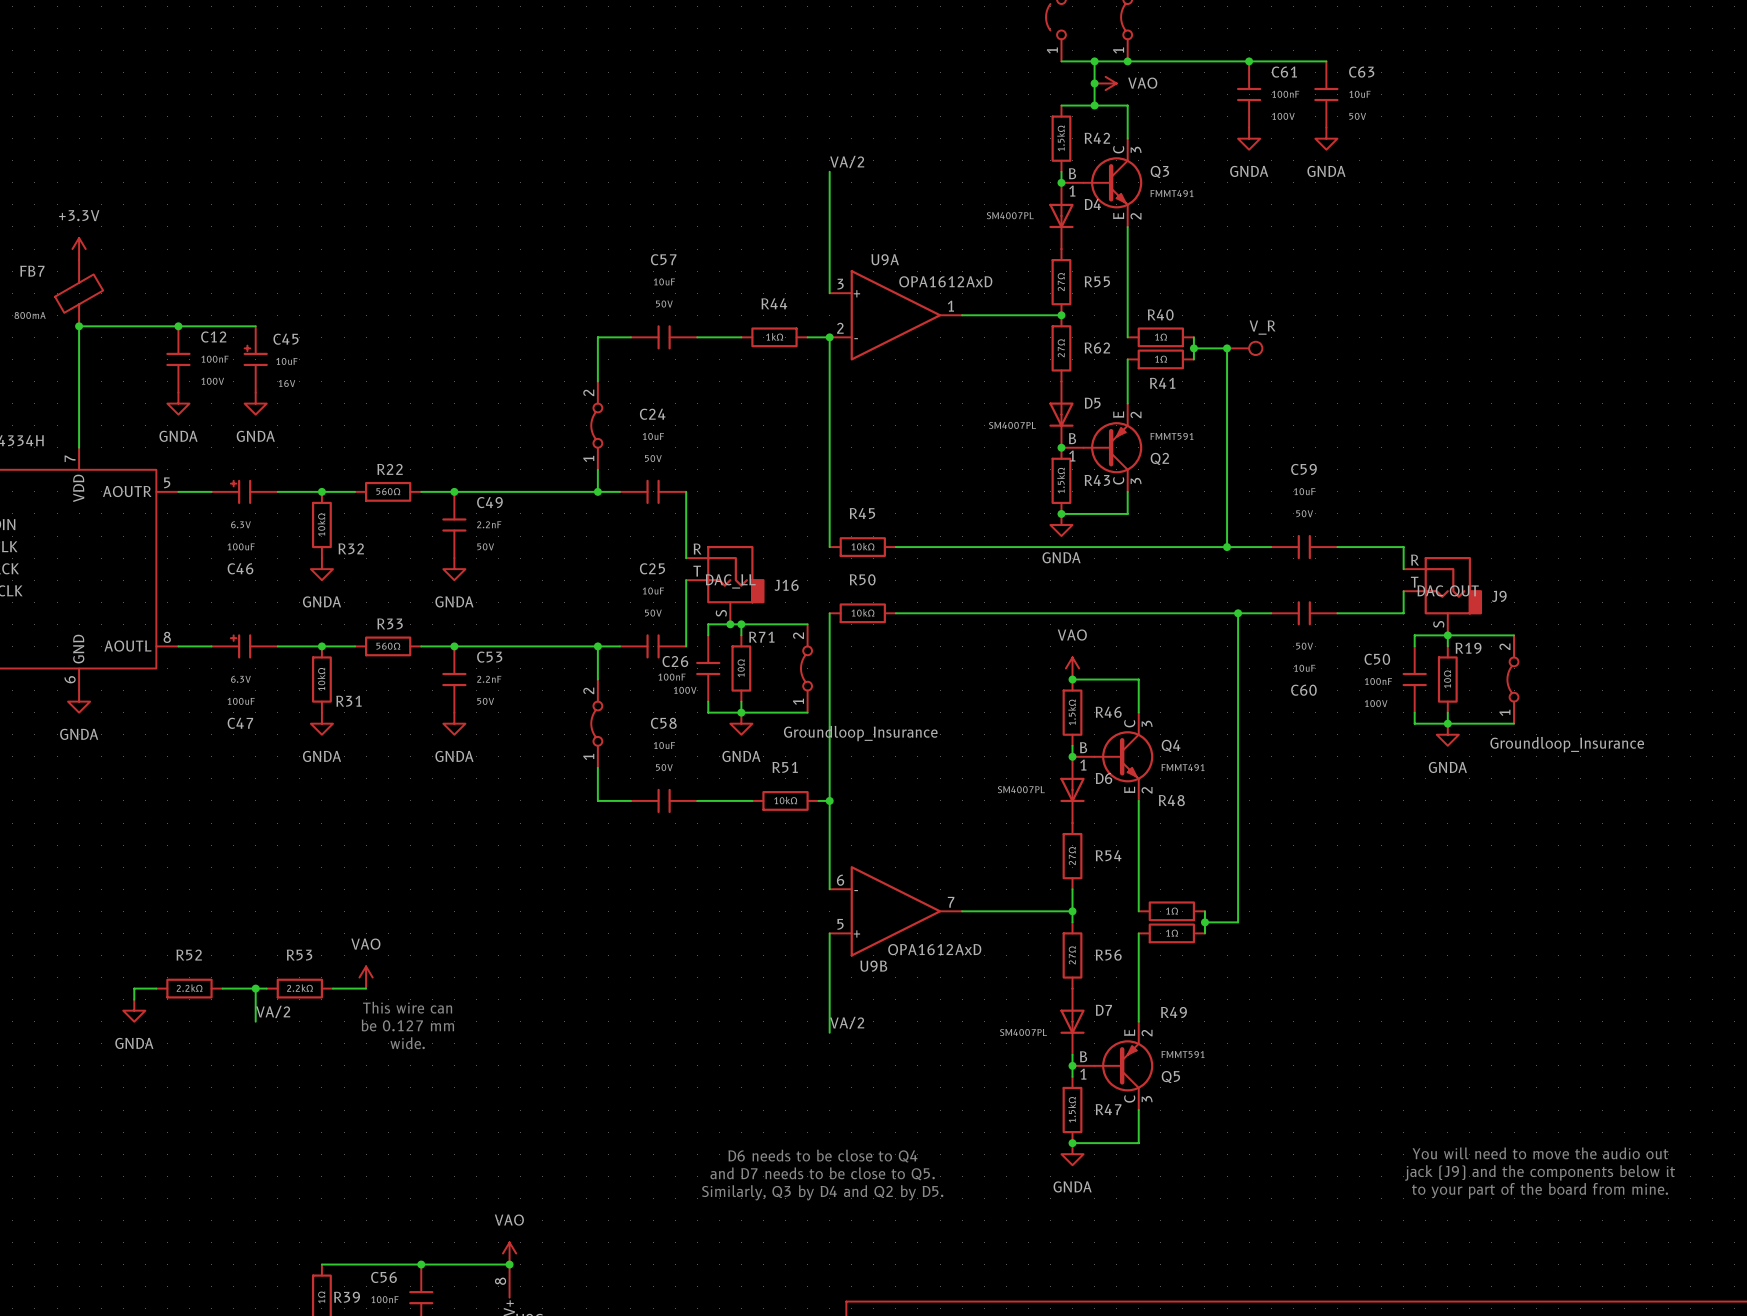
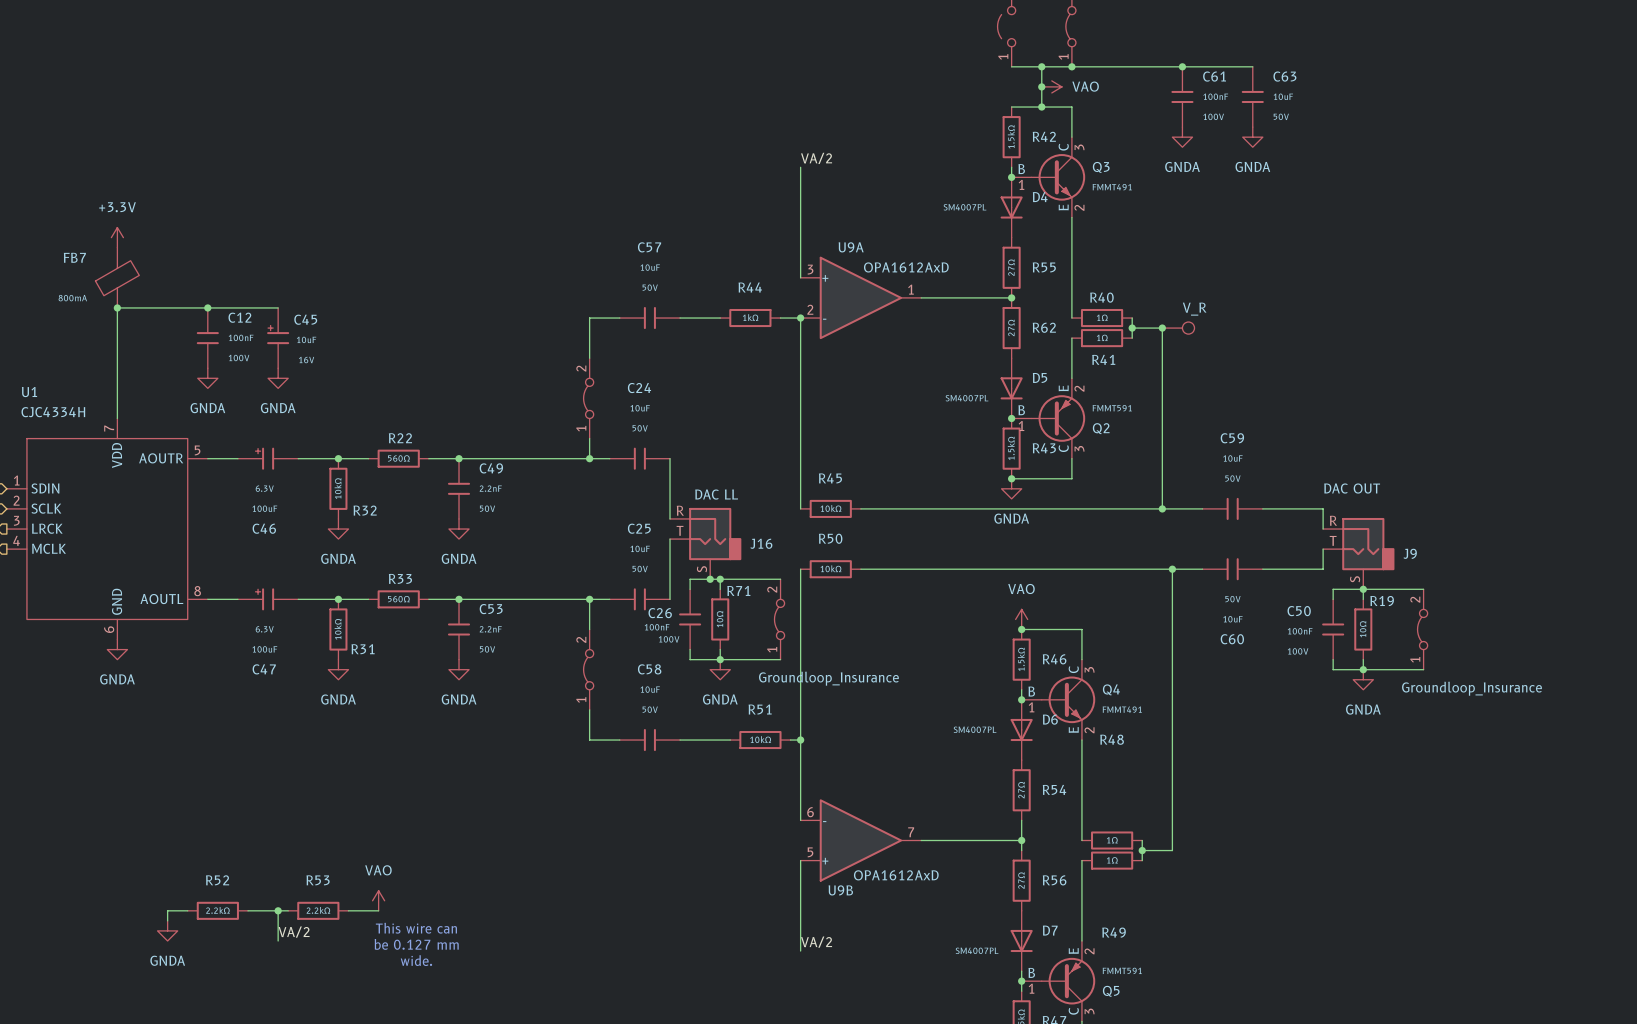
J9 value: none -> DAC OUT (1352, 488)
J16 value: none -> DAC LL (716, 494)
J16 text: DAC_LL (730, 581) -> none
J9 text: DAC OUT (1448, 590) -> none

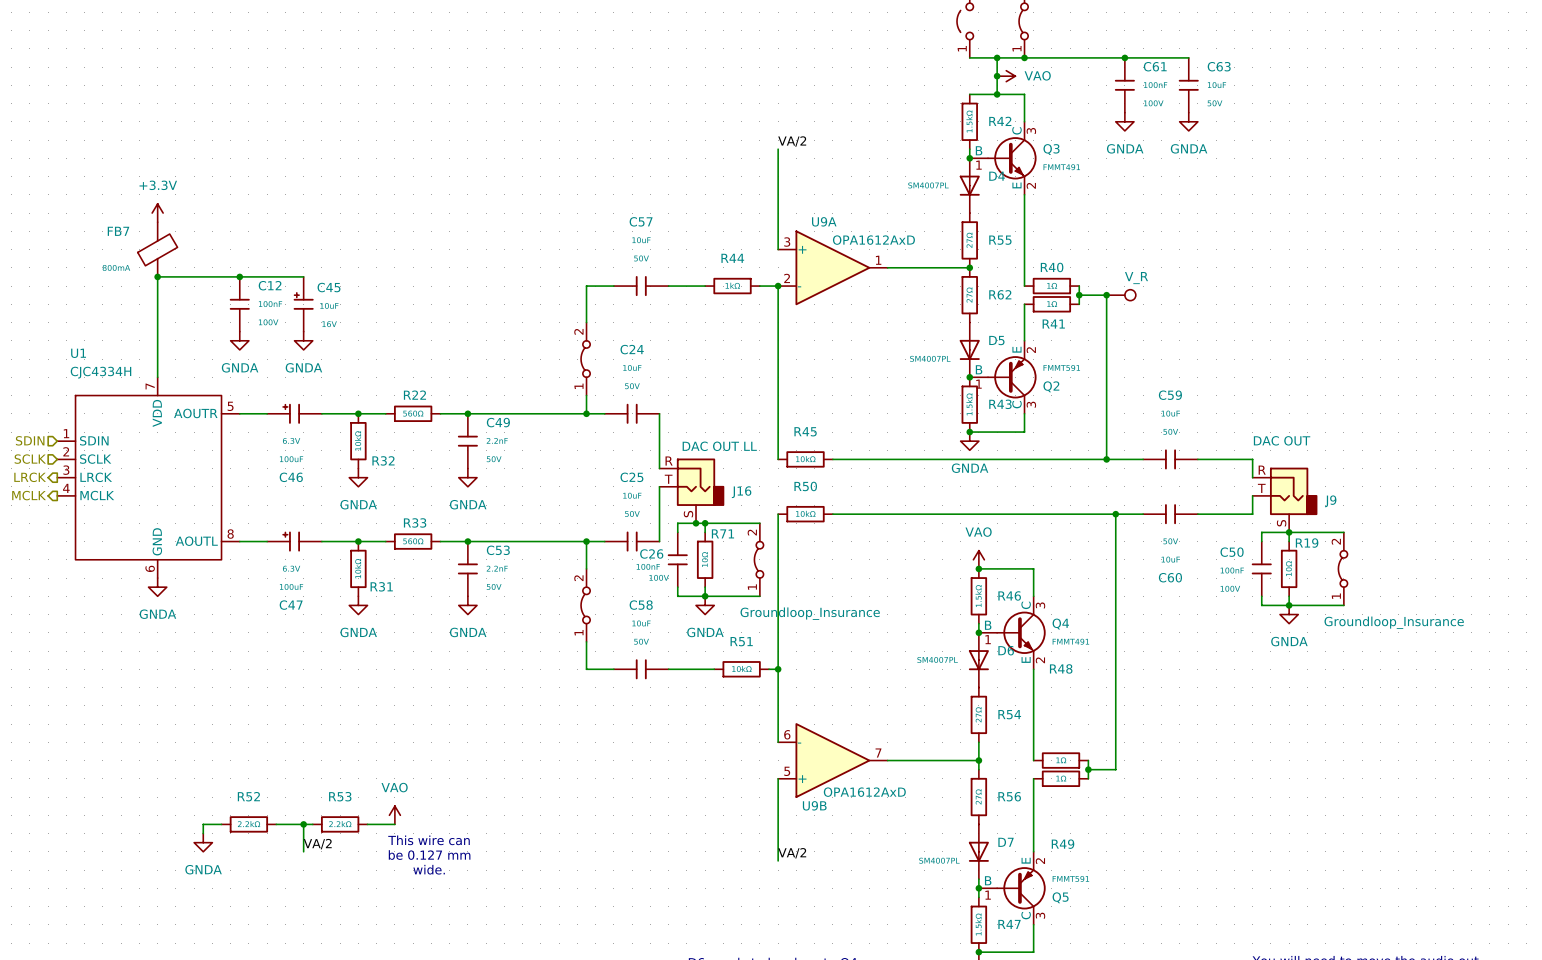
J16 value: DAC LL (716, 494) -> DAC OUT LL (719, 446)

